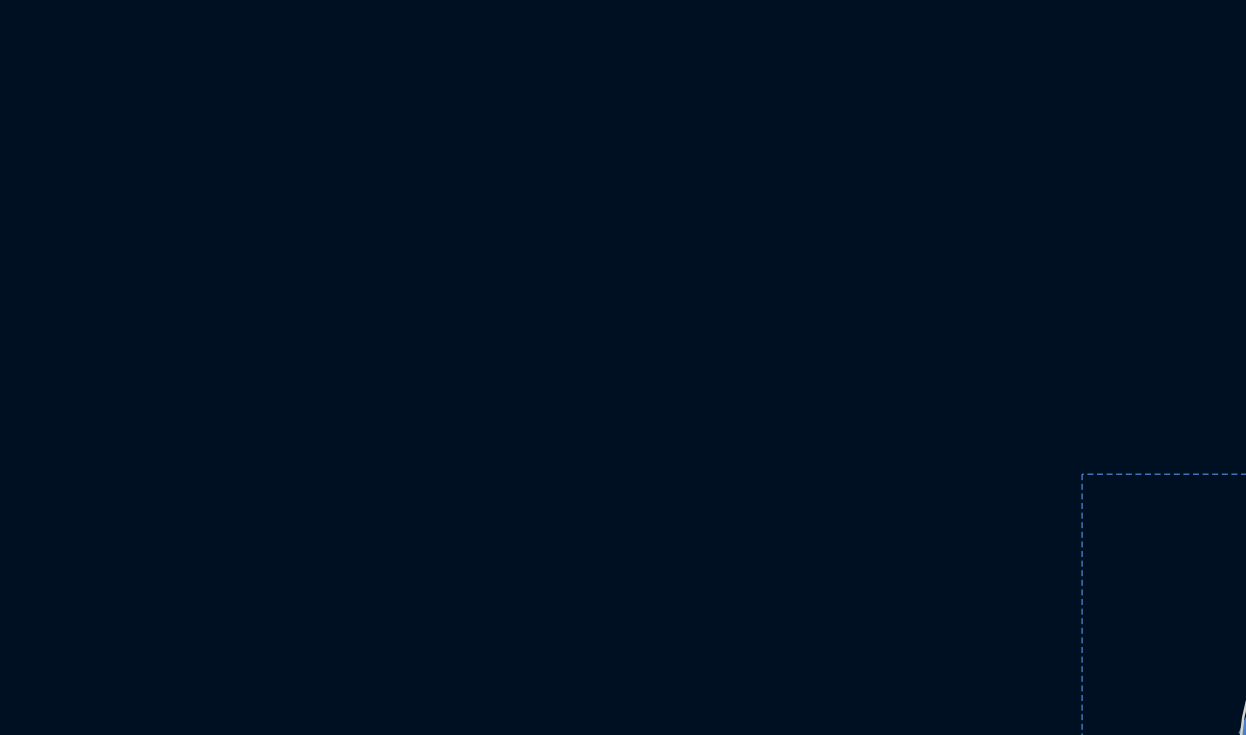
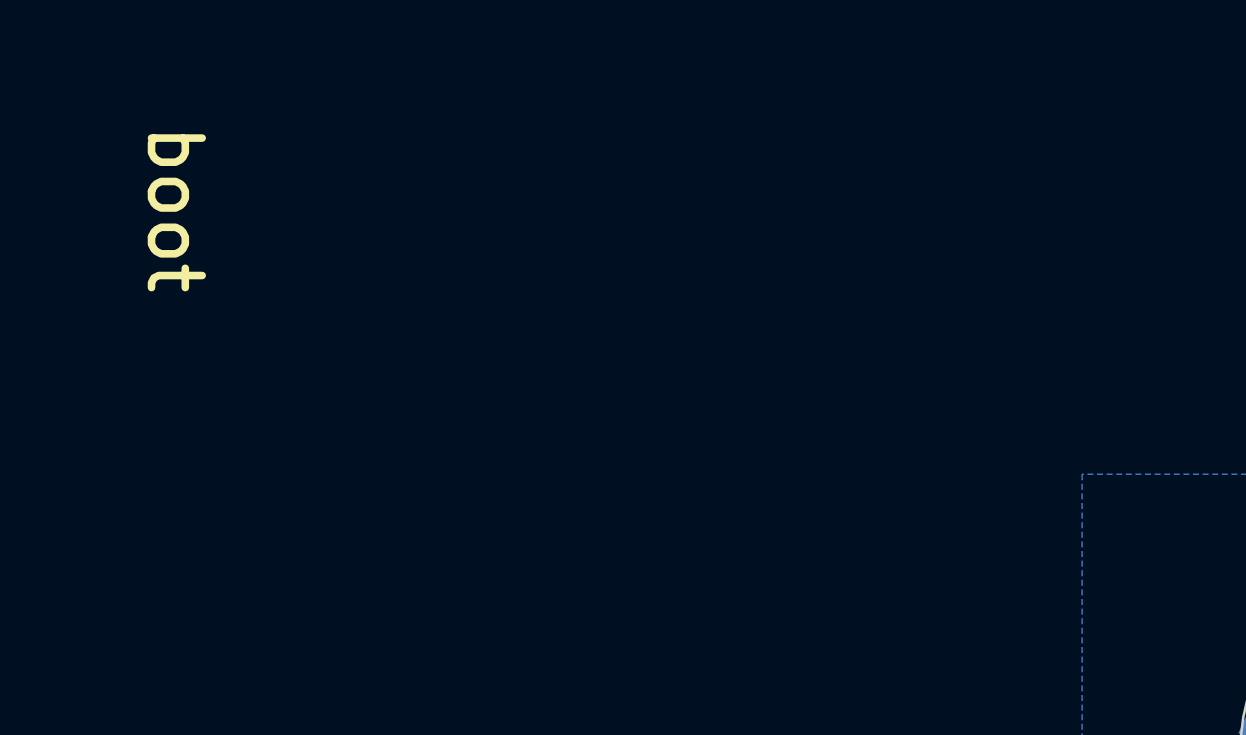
text: none -> boot (176, 212)

